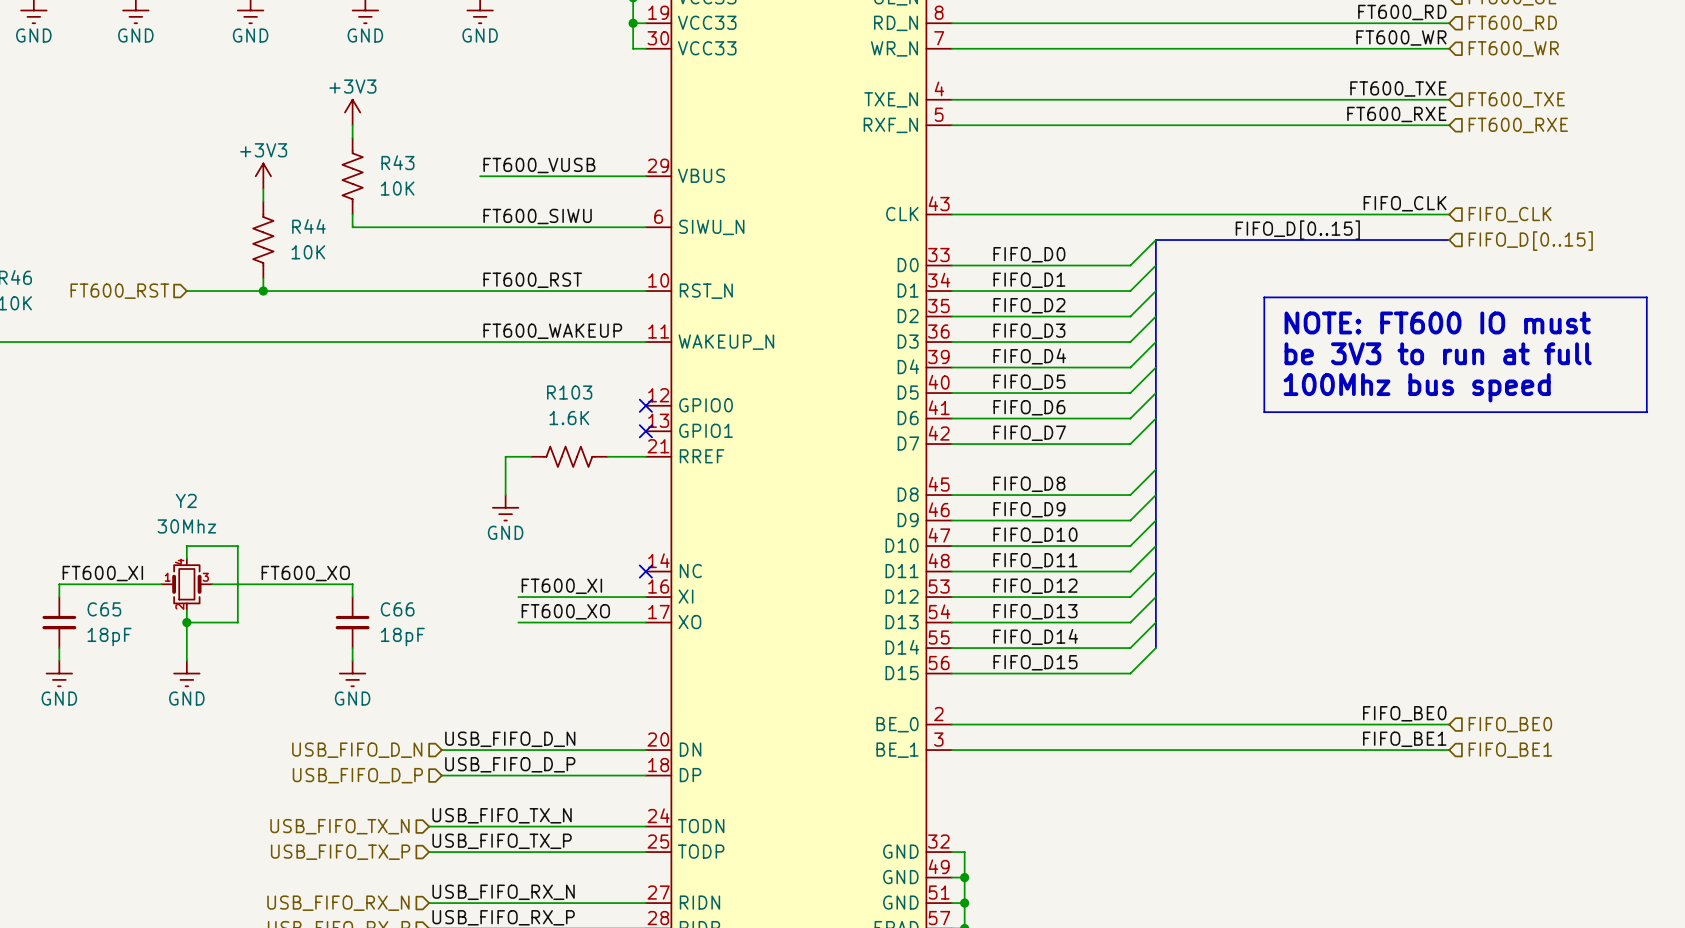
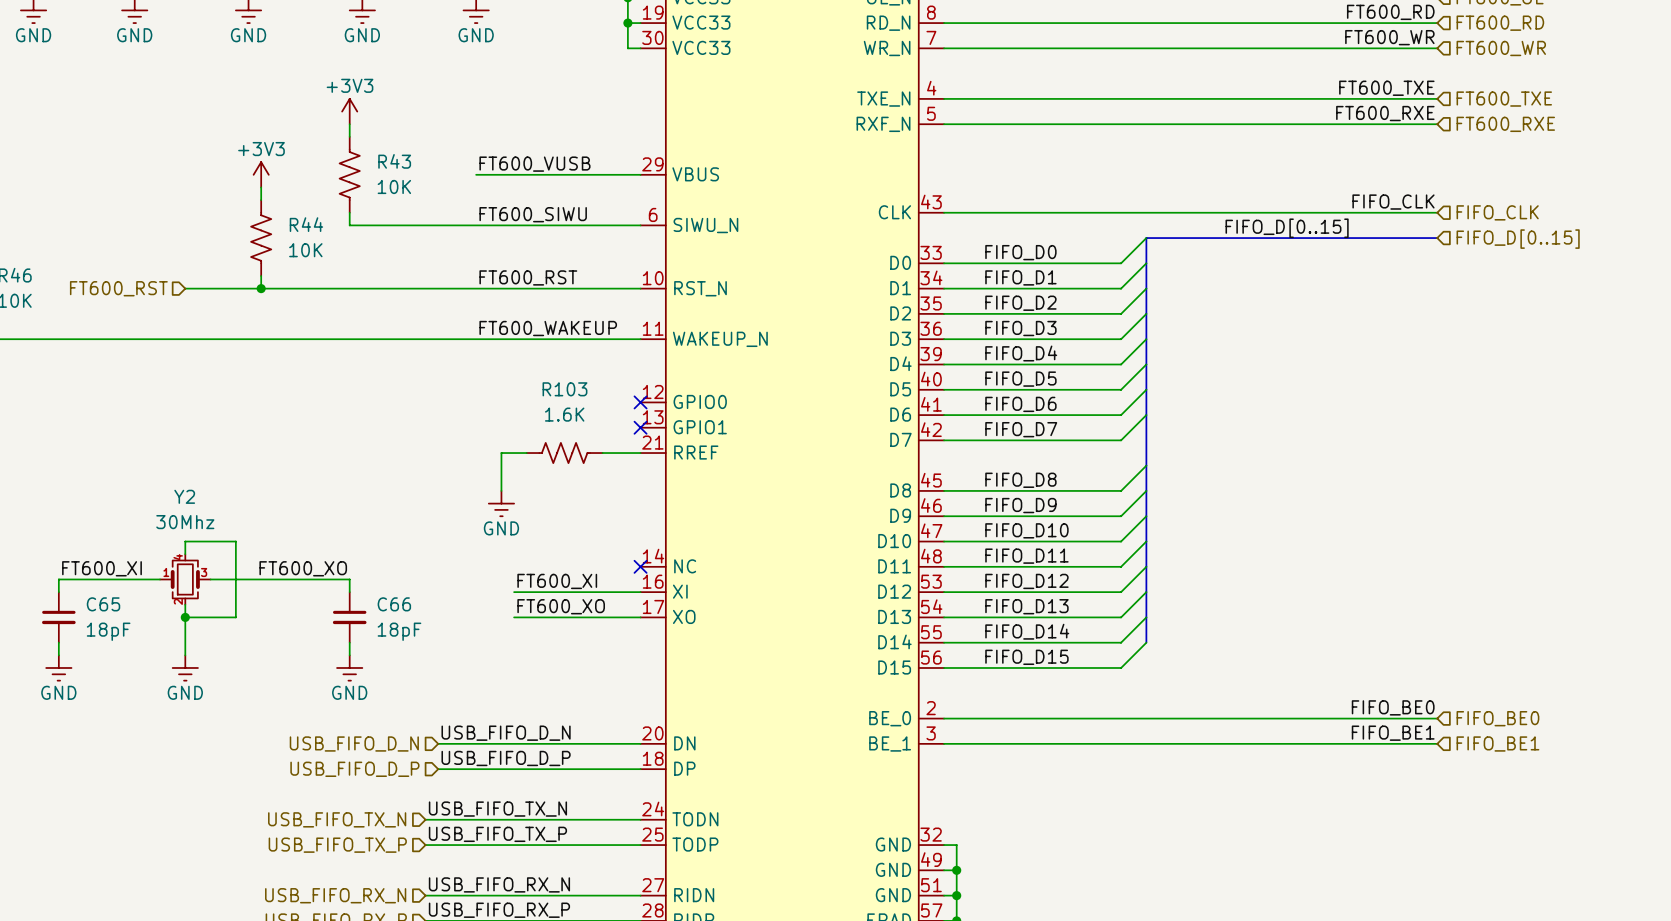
line: (1264, 297) (1646, 297) (1646, 412) (1264, 412) (1264, 297) -> none
text: NOTE: FT600 IO must (1437, 322) -> none
text: be 3V3 to run at full (1438, 353) -> none
text: 100Mhz bus speed (1417, 387) -> none

